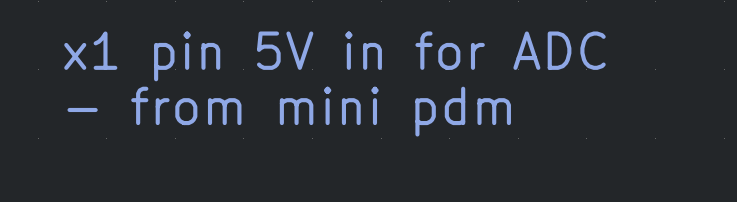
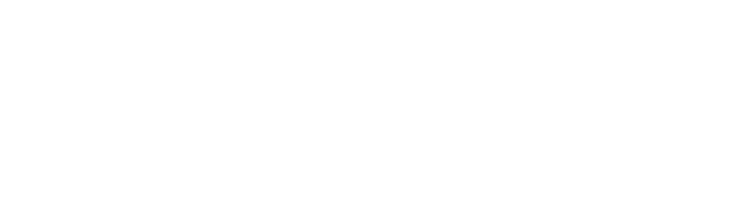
text: x1 pin 5V in for ADC (334, 56) -> none
text: - from mini pdm (289, 111) -> none

